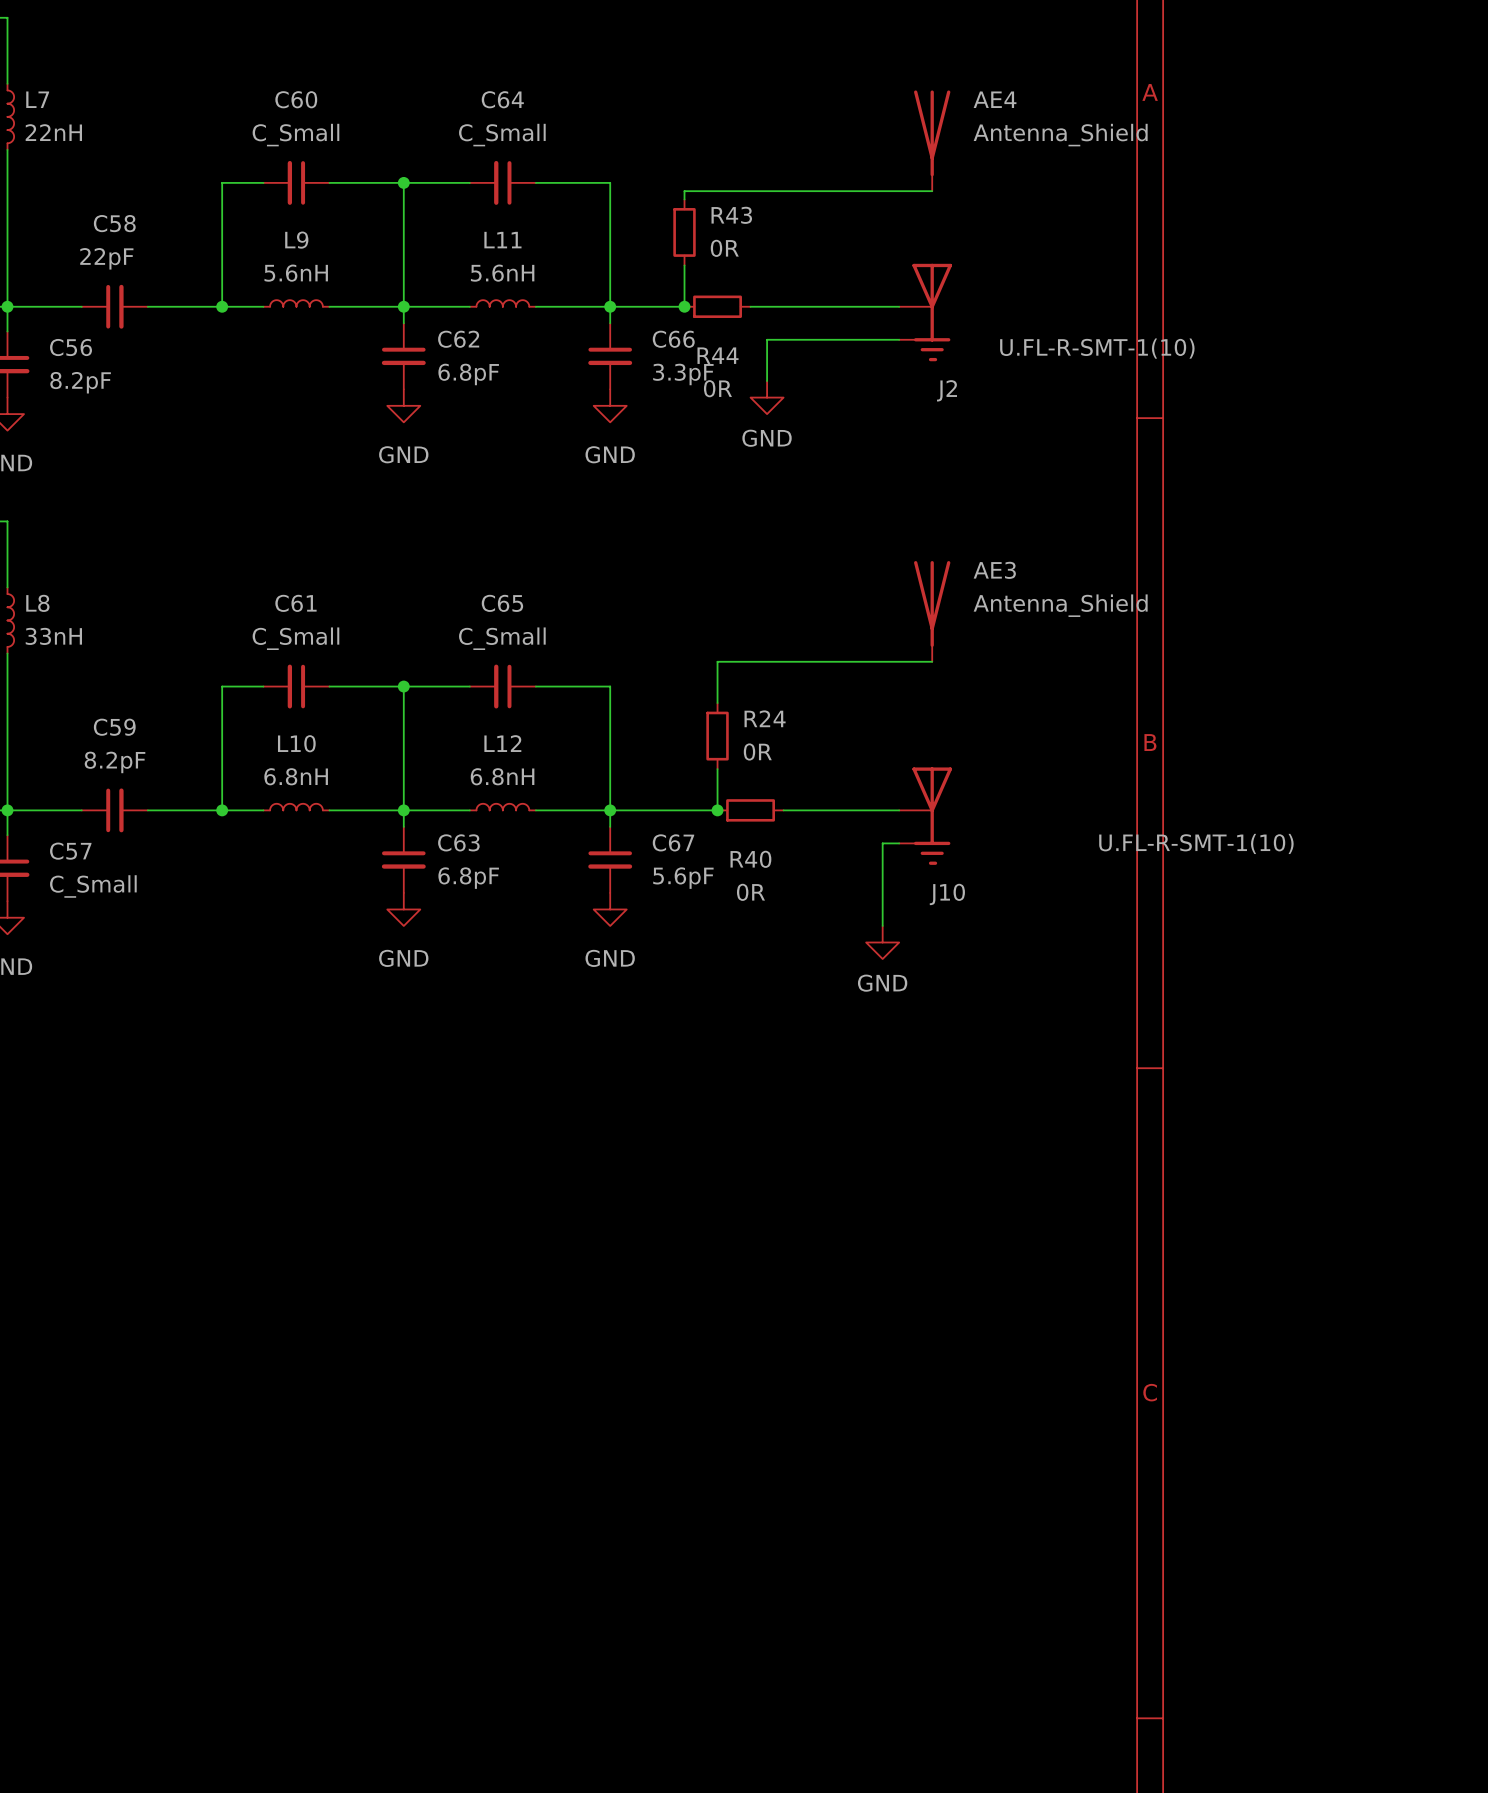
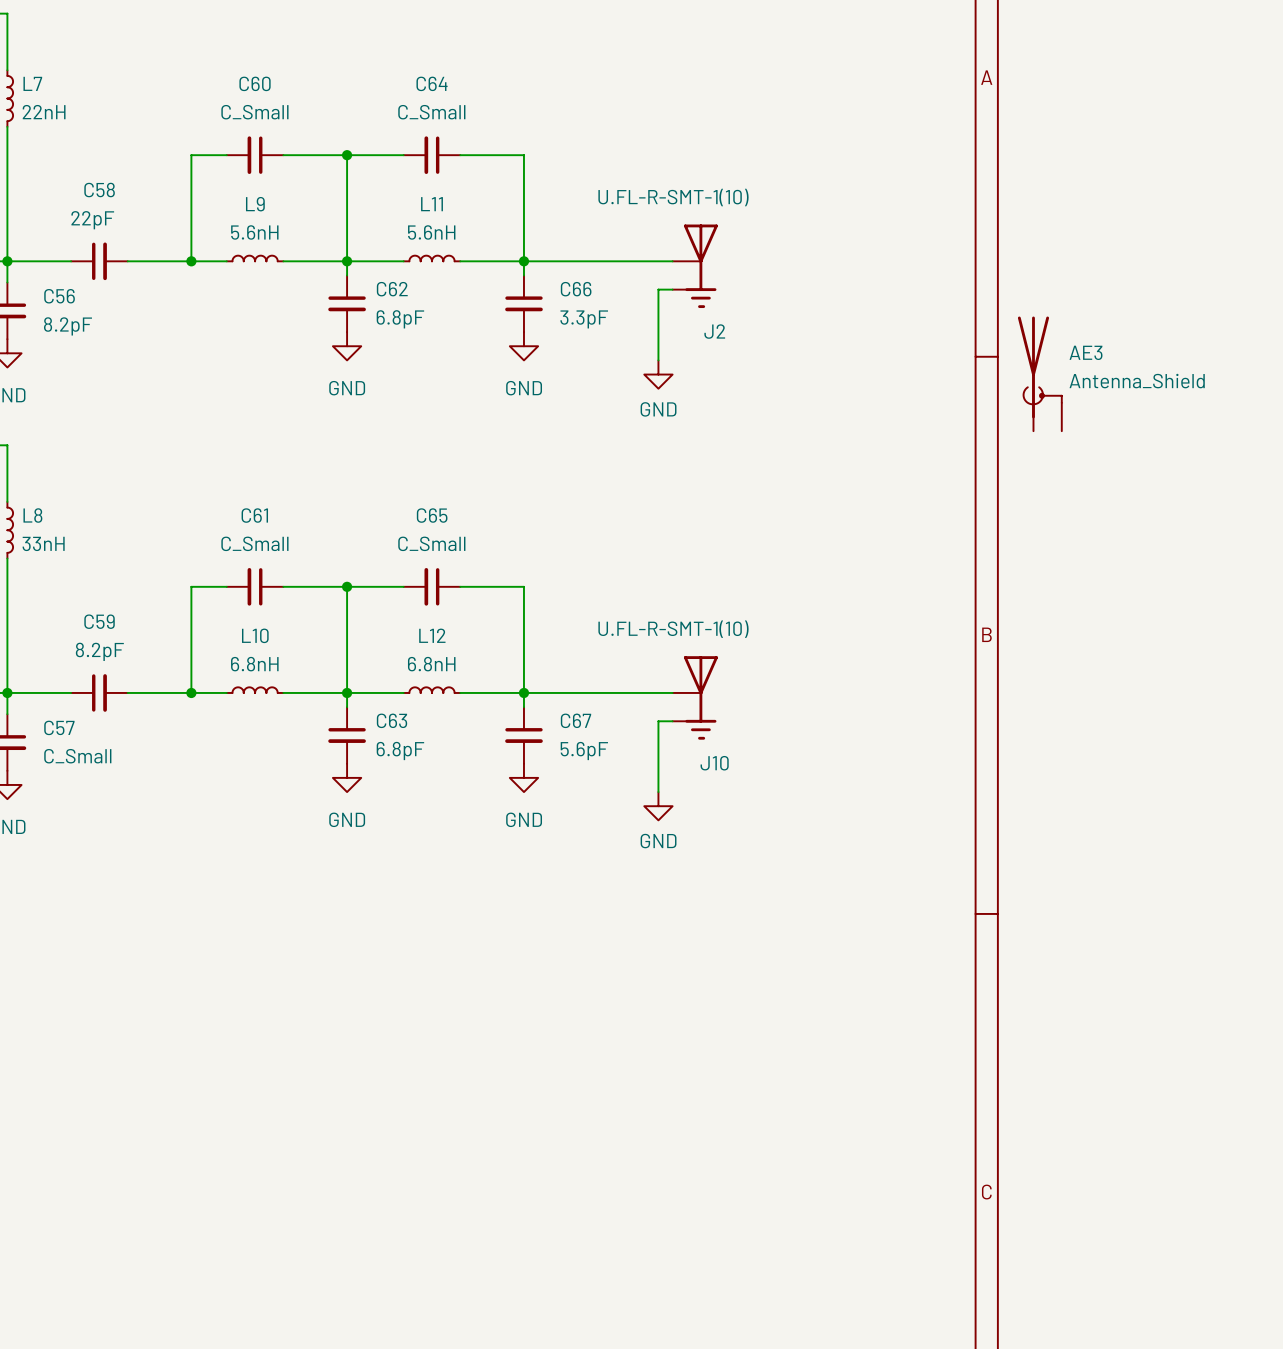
AE4: Antenna_Shield (932, 140) -> none
wire: (932, 191) (684, 191) (684, 199) -> none
R43: 0R (684, 232) -> none
wire: (684, 265) (684, 306) -> (644, 261) (587, 261)
junction: (684, 306) -> none
R44: 0R (717, 306) -> none
wire: (783, 306) (899, 306) -> none
J2 position: (925, 312) -> (695, 266)
wire: (783, 339) (899, 339) -> none
J2 value position: U.FL-R-SMT-1(10) (1097, 348) -> U.FL-R-SMT-1(10) (673, 197)
wire: none -> (658, 325) (658, 360)
power symbol position: GND (767, 397) -> GND (658, 374)
AE3 symbol: [914, 561, 951, 662] -> [1017, 316, 1062, 432]
wire: (932, 661) (717, 661) (717, 703) -> none
R24: 0R (717, 736) -> none
wire: (717, 769) (717, 810) -> (672, 692) (615, 692)
junction: (717, 810) -> none
R40: 0R (750, 810) -> none
wire: (783, 810) (899, 810) -> none
J10 position: (925, 816) -> (695, 697)
wire: (899, 843) (882, 843) (882, 925) -> (672, 721) (658, 721) (658, 792)
J10 value position: U.FL-R-SMT-1(10) (1196, 843) -> U.FL-R-SMT-1(10) (673, 629)
power symbol position: GND (882, 942) -> GND (658, 806)

